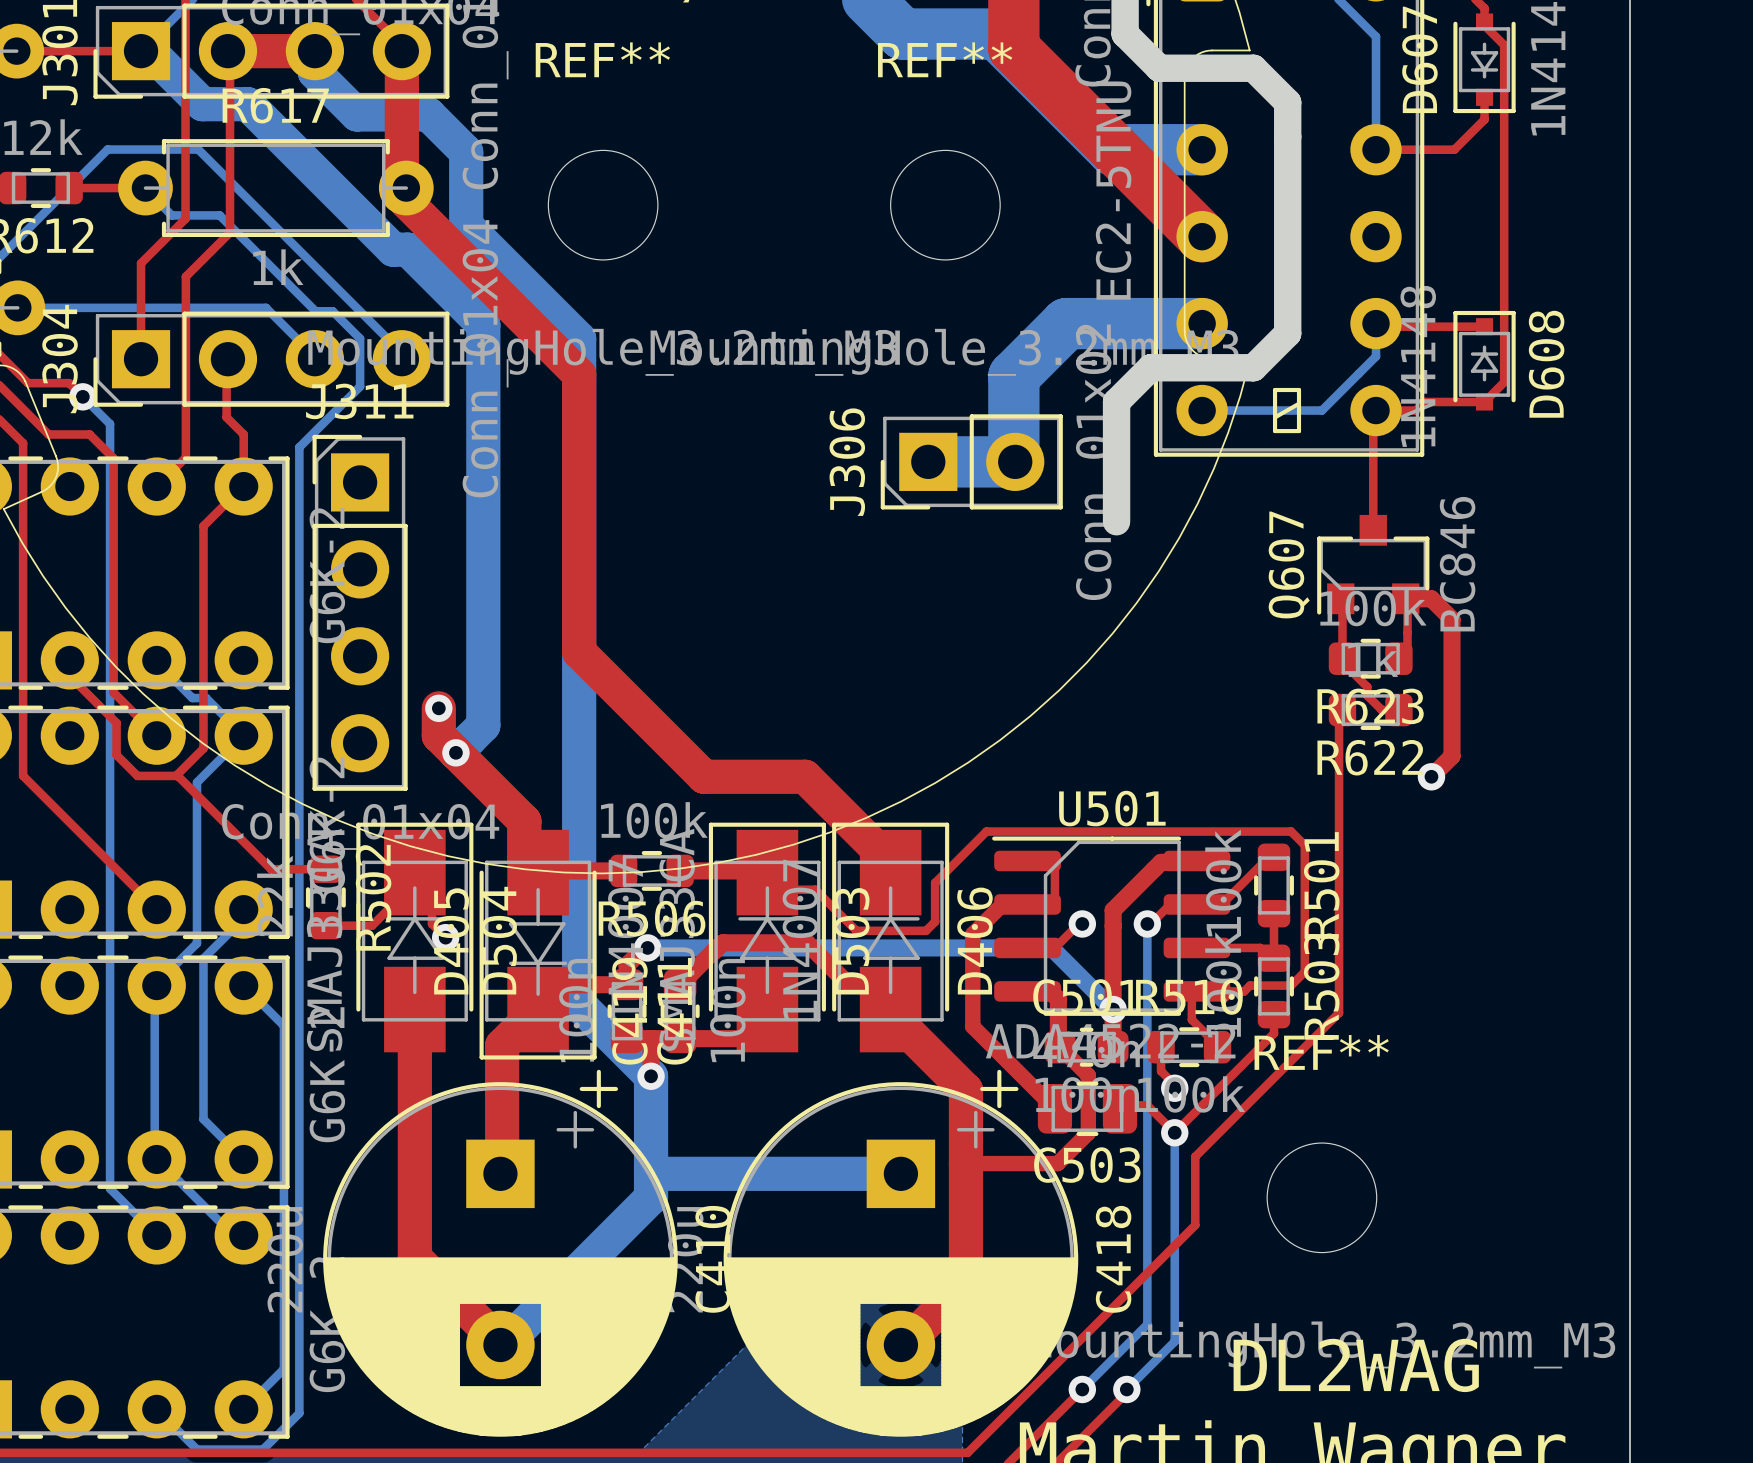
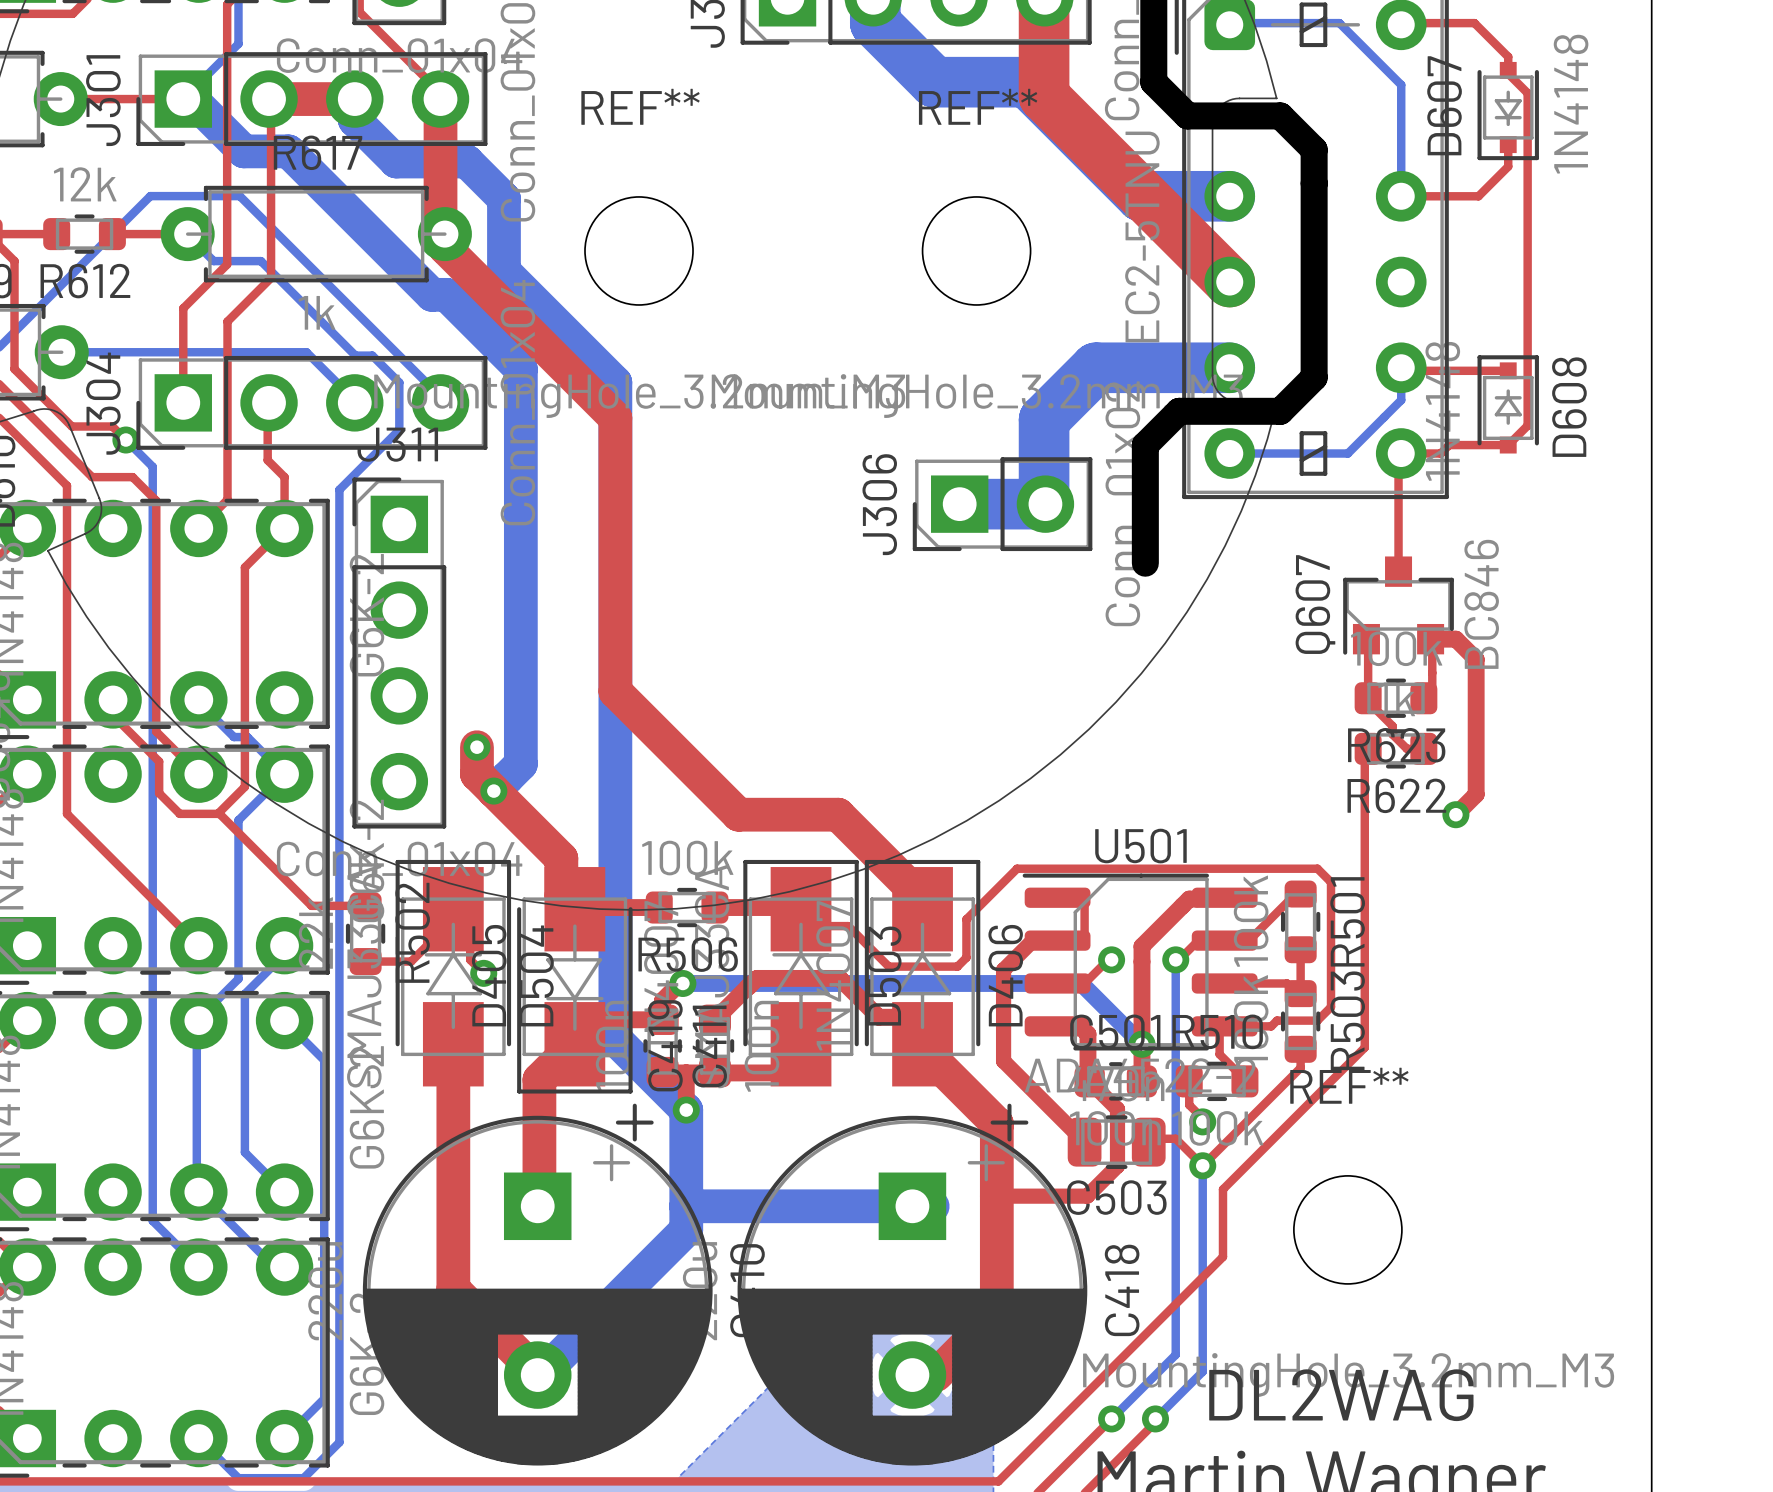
C418 position: (900, 1253) -> (912, 1284)

